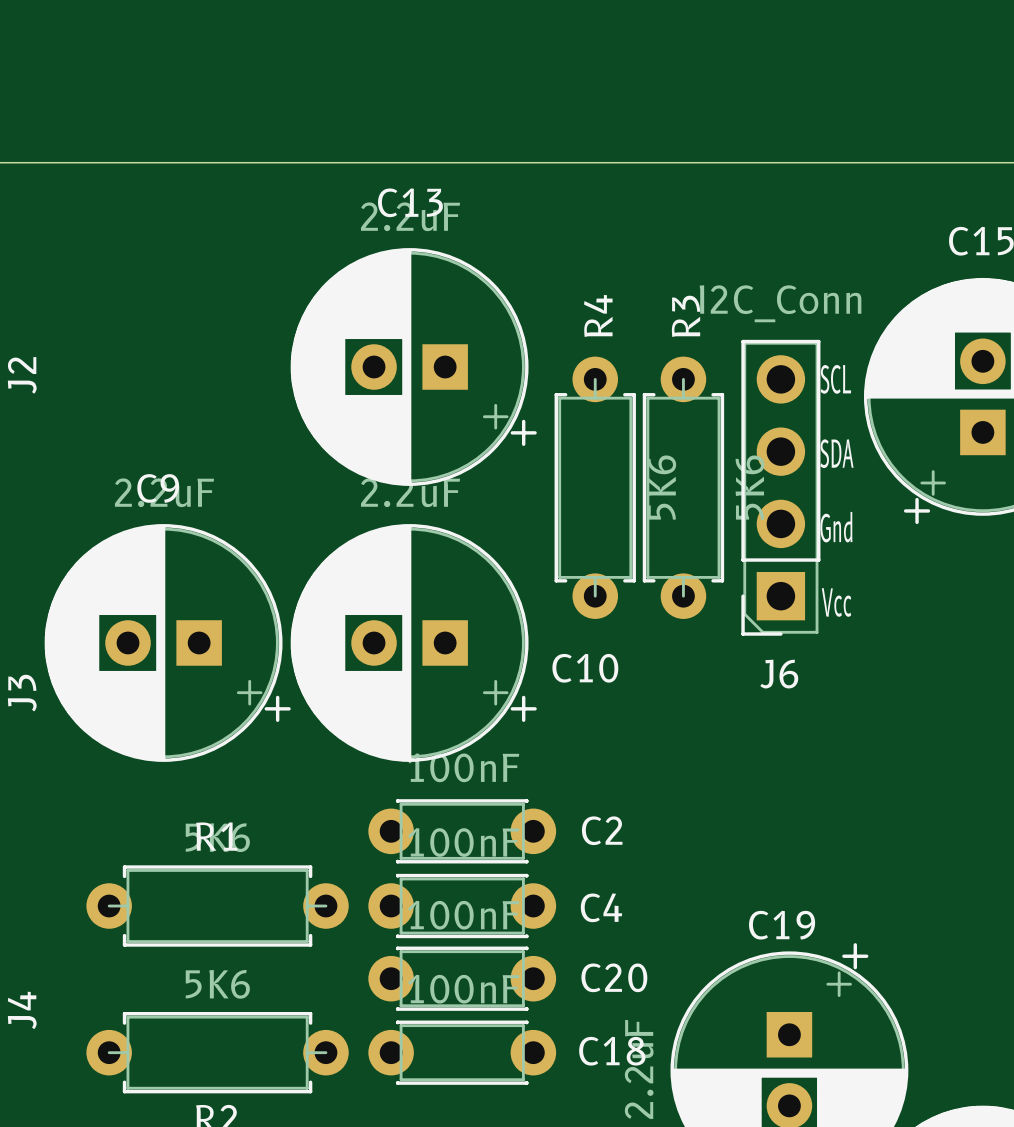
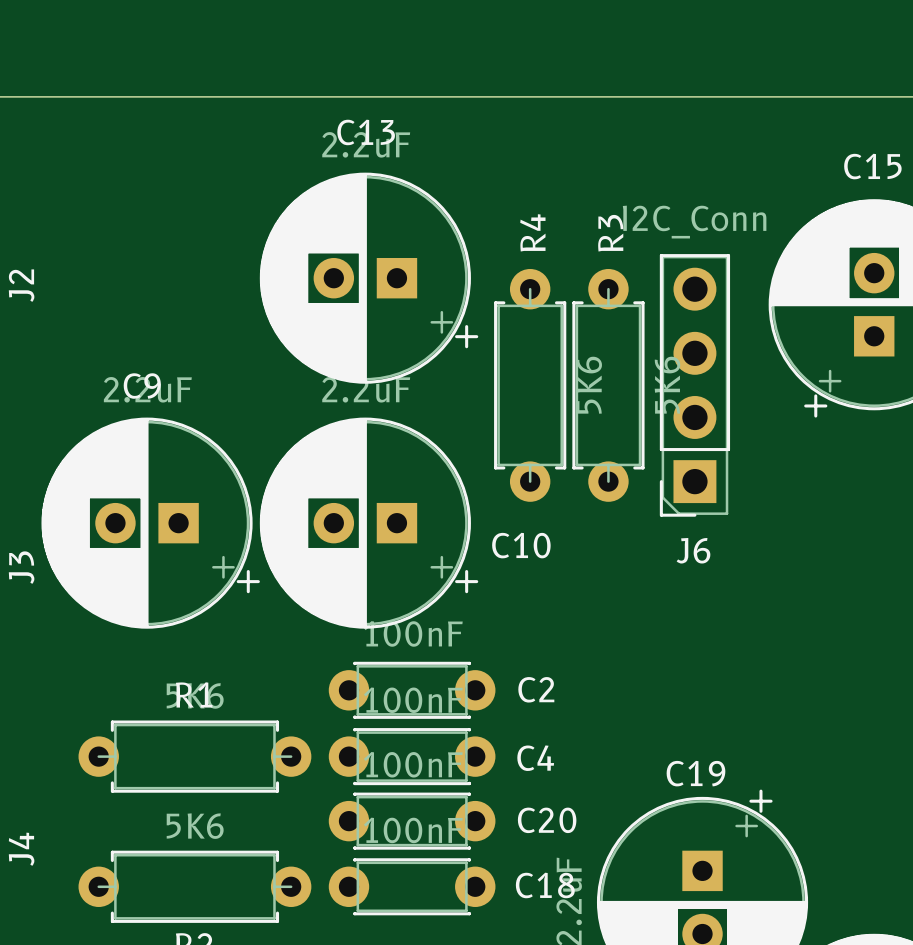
text: SCL (835, 379) -> none
text: SDA (836, 453) -> none
text: Gnd (836, 527) -> none
text: Vcc (836, 602) -> none

